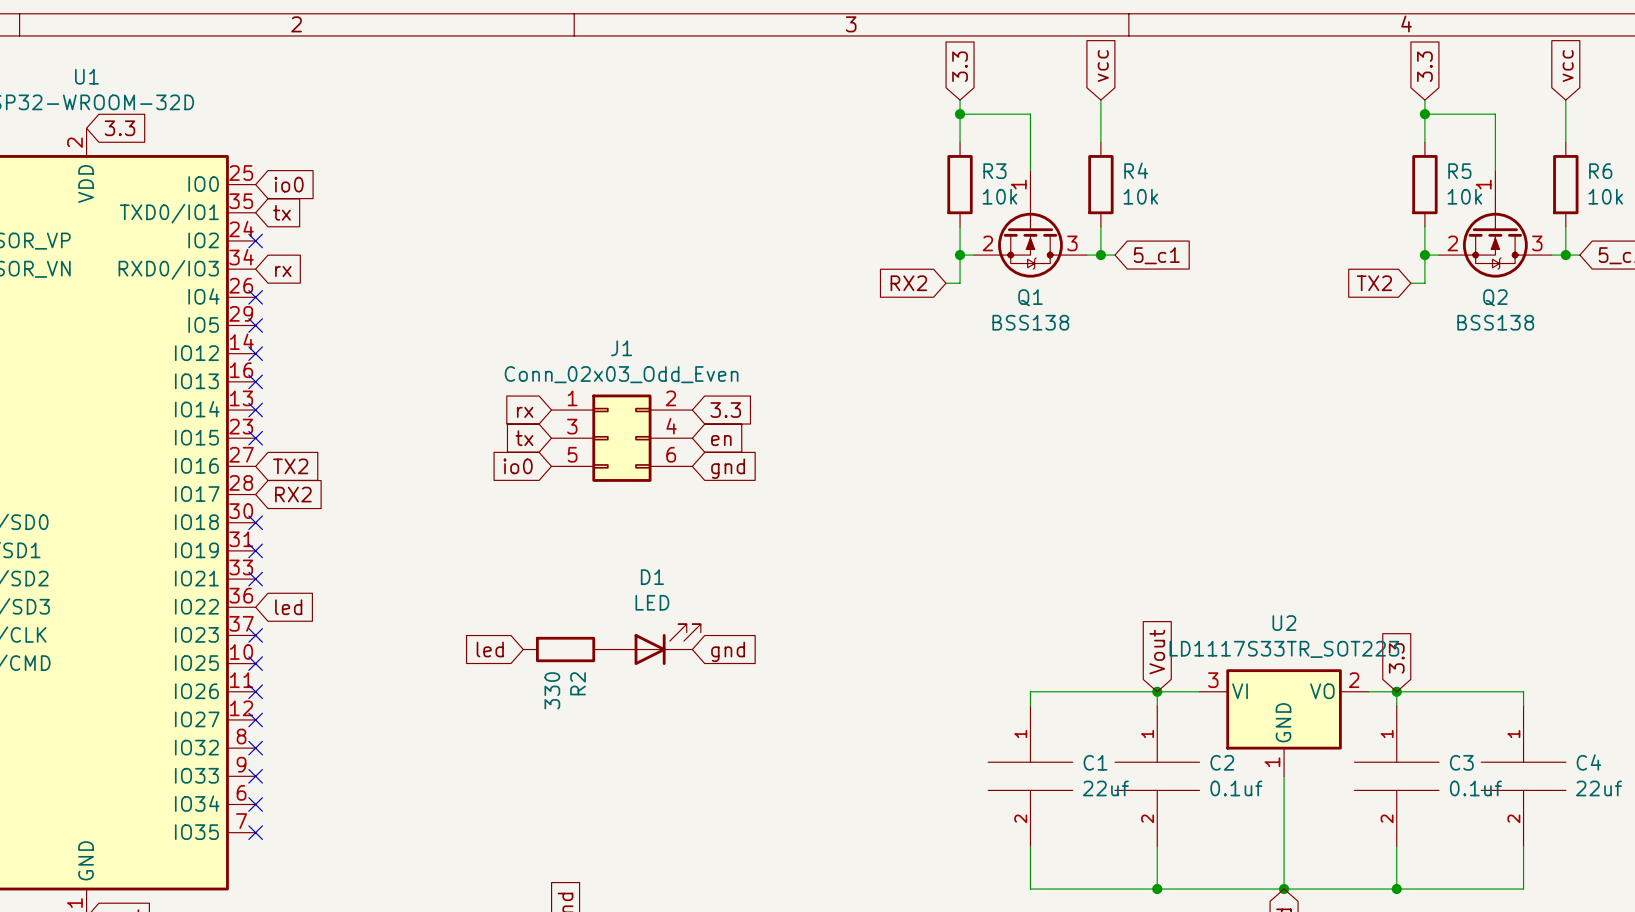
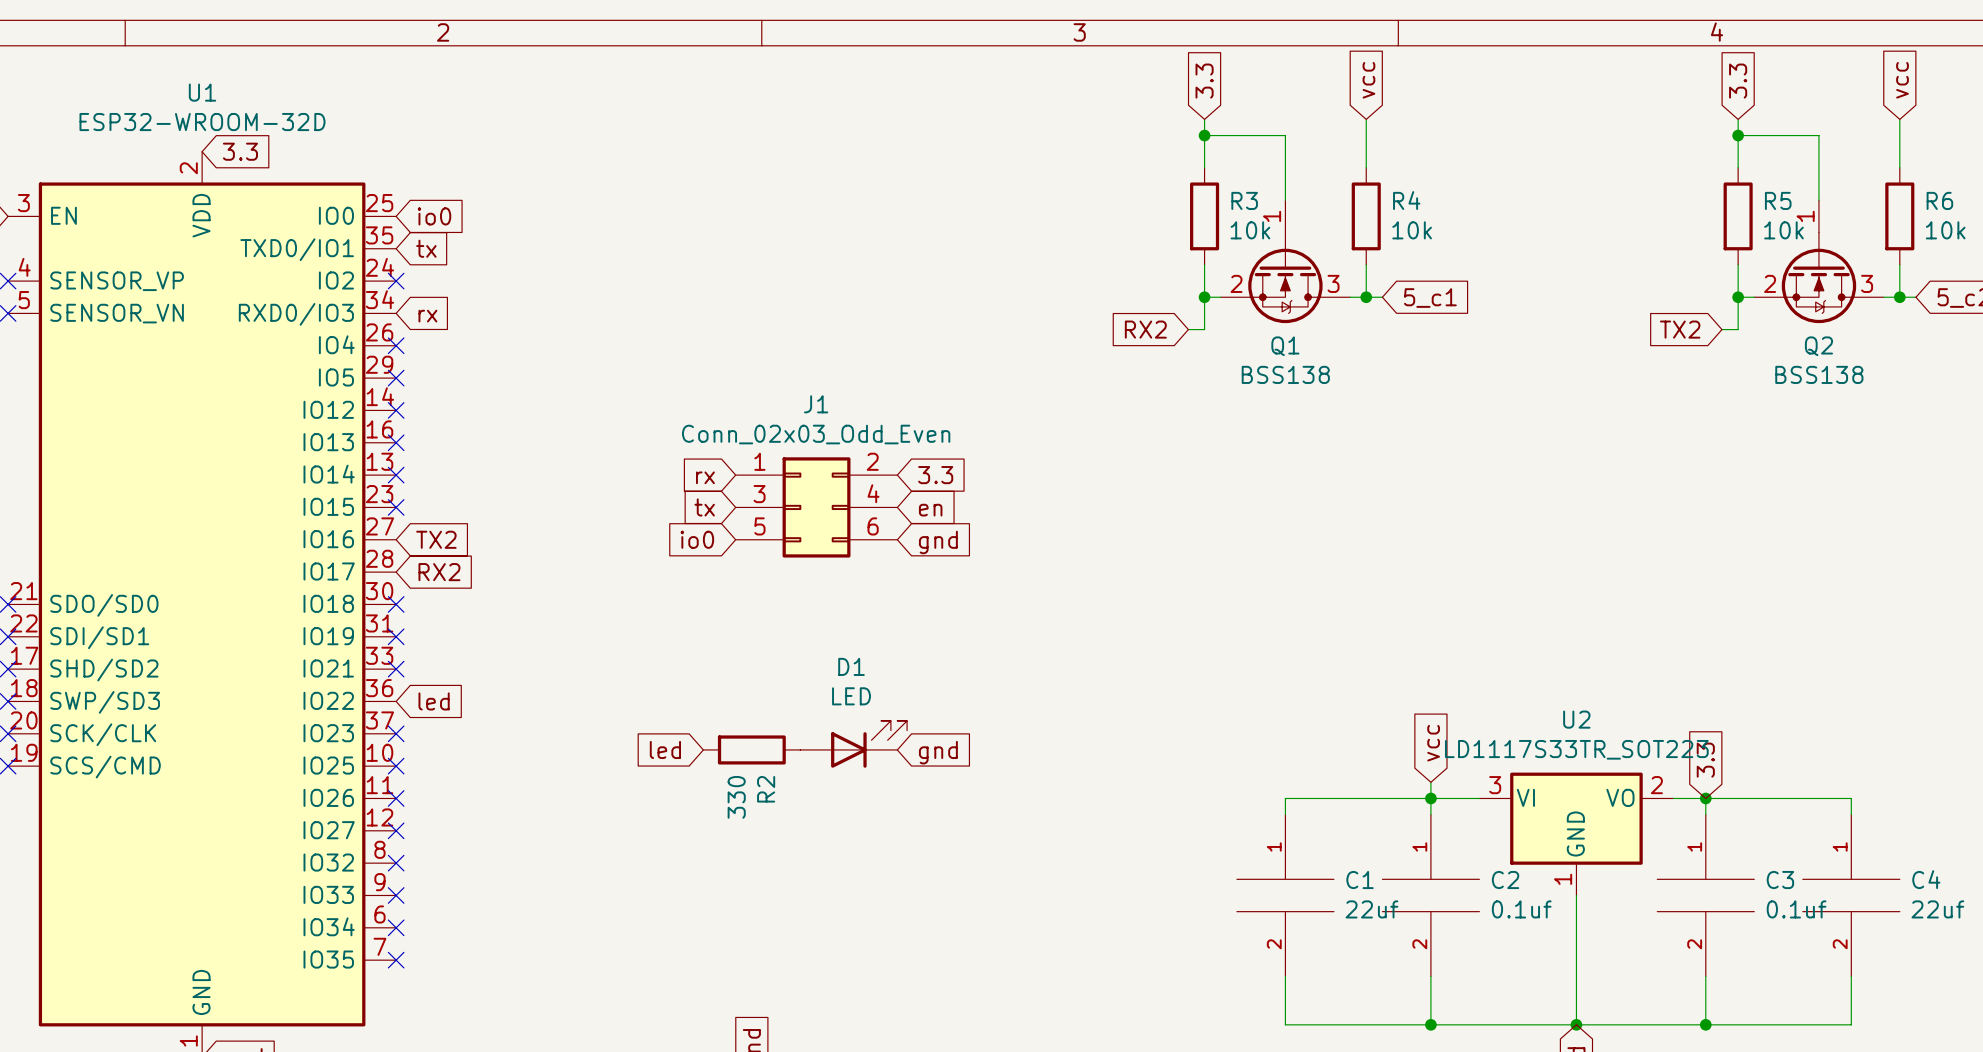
global label: none -> vcc (1433, 743)
global label: Vout (1157, 652) -> none
wire: none -> (1430, 782) (1430, 798)

